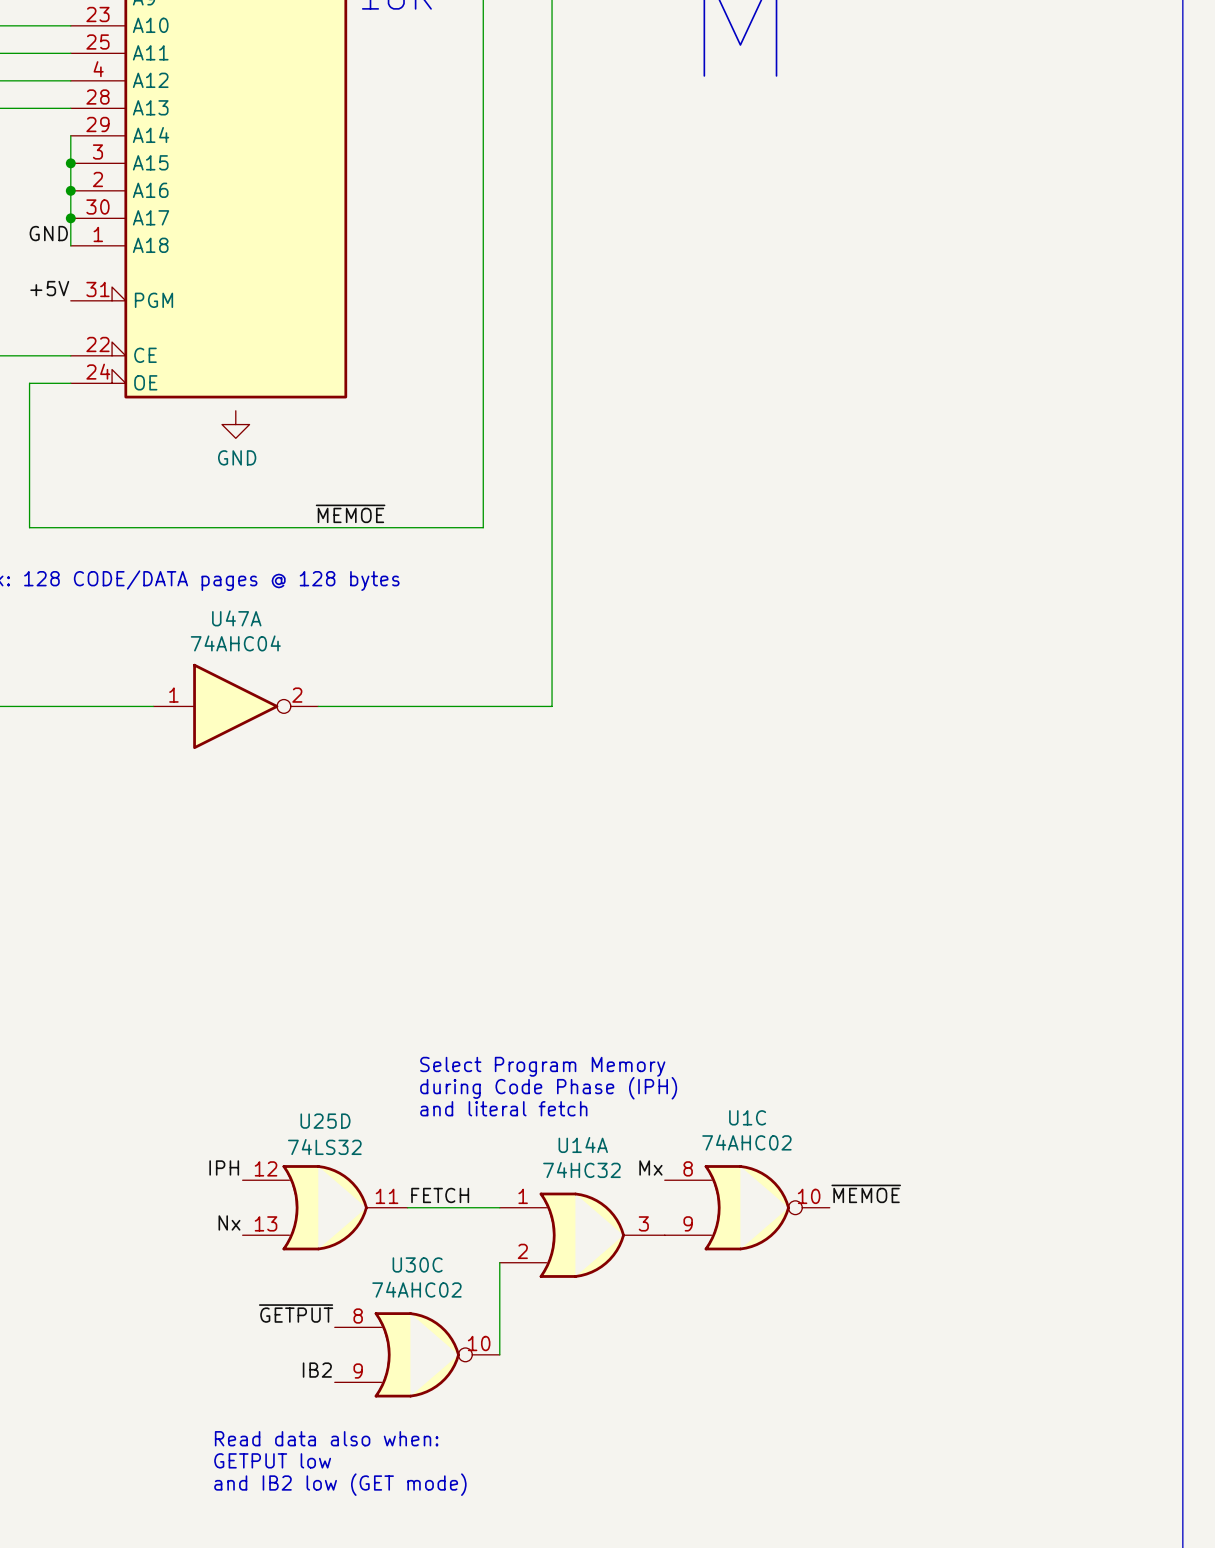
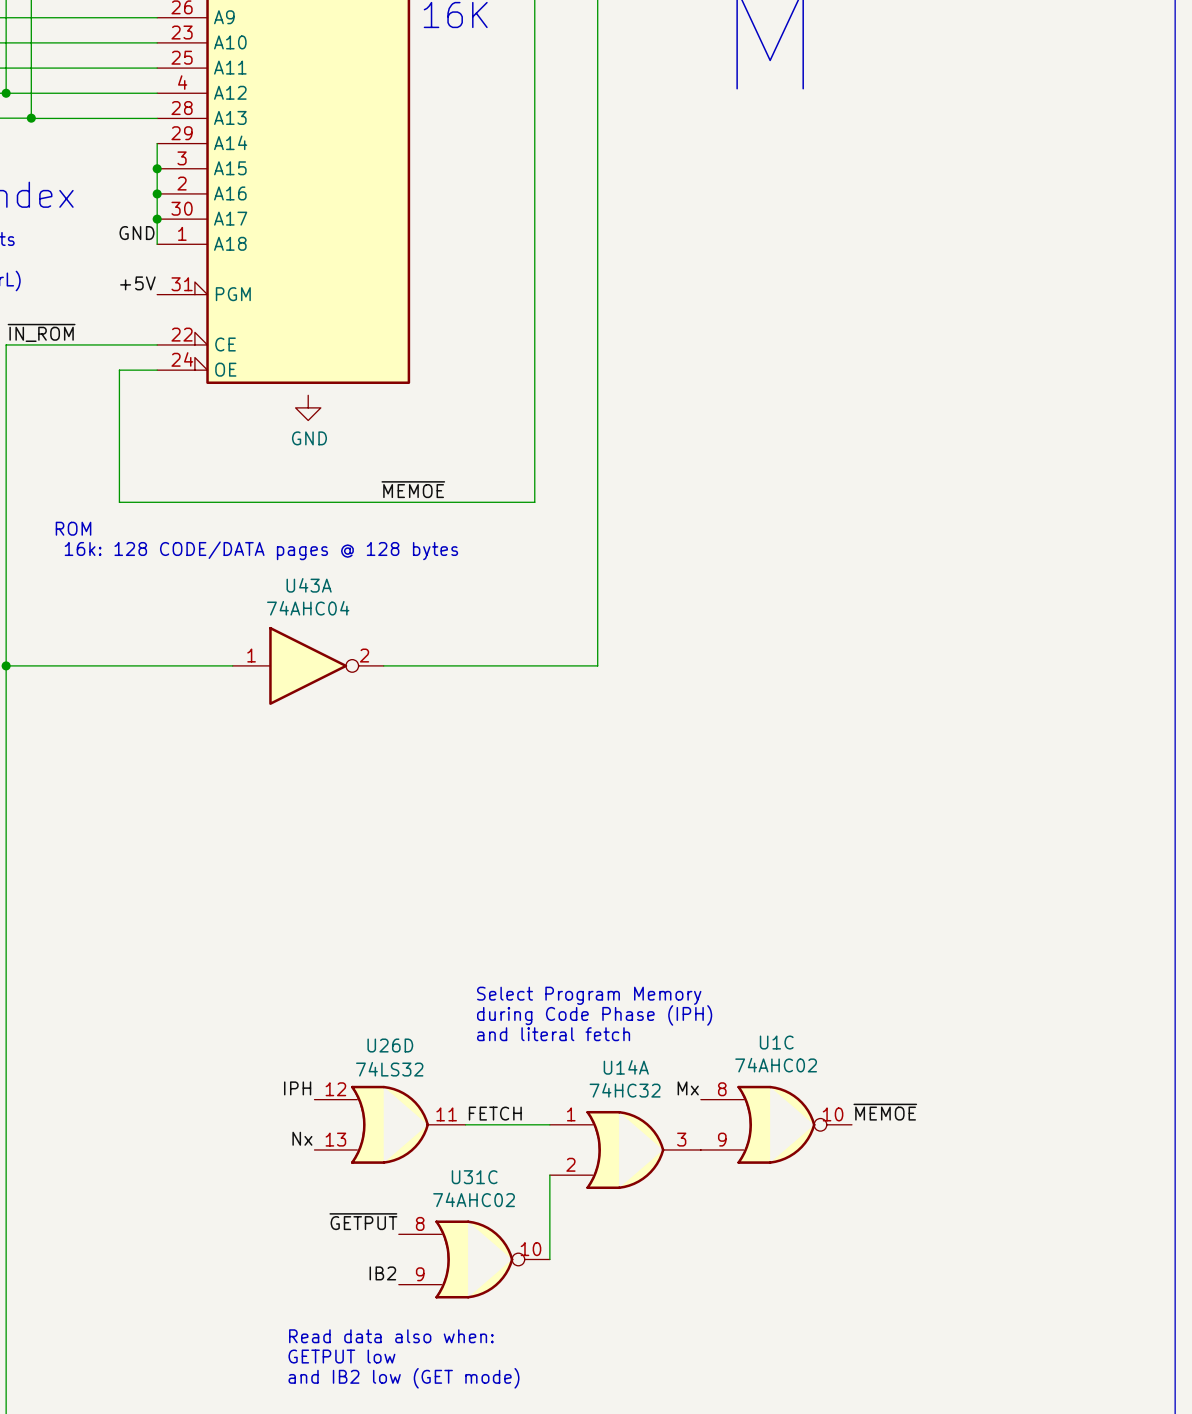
U47A name: U47A (236, 618) -> U43A (309, 585)
U25D name: U25D (325, 1121) -> U26D (390, 1045)
U30C name: U30C (417, 1264) -> U31C (474, 1177)

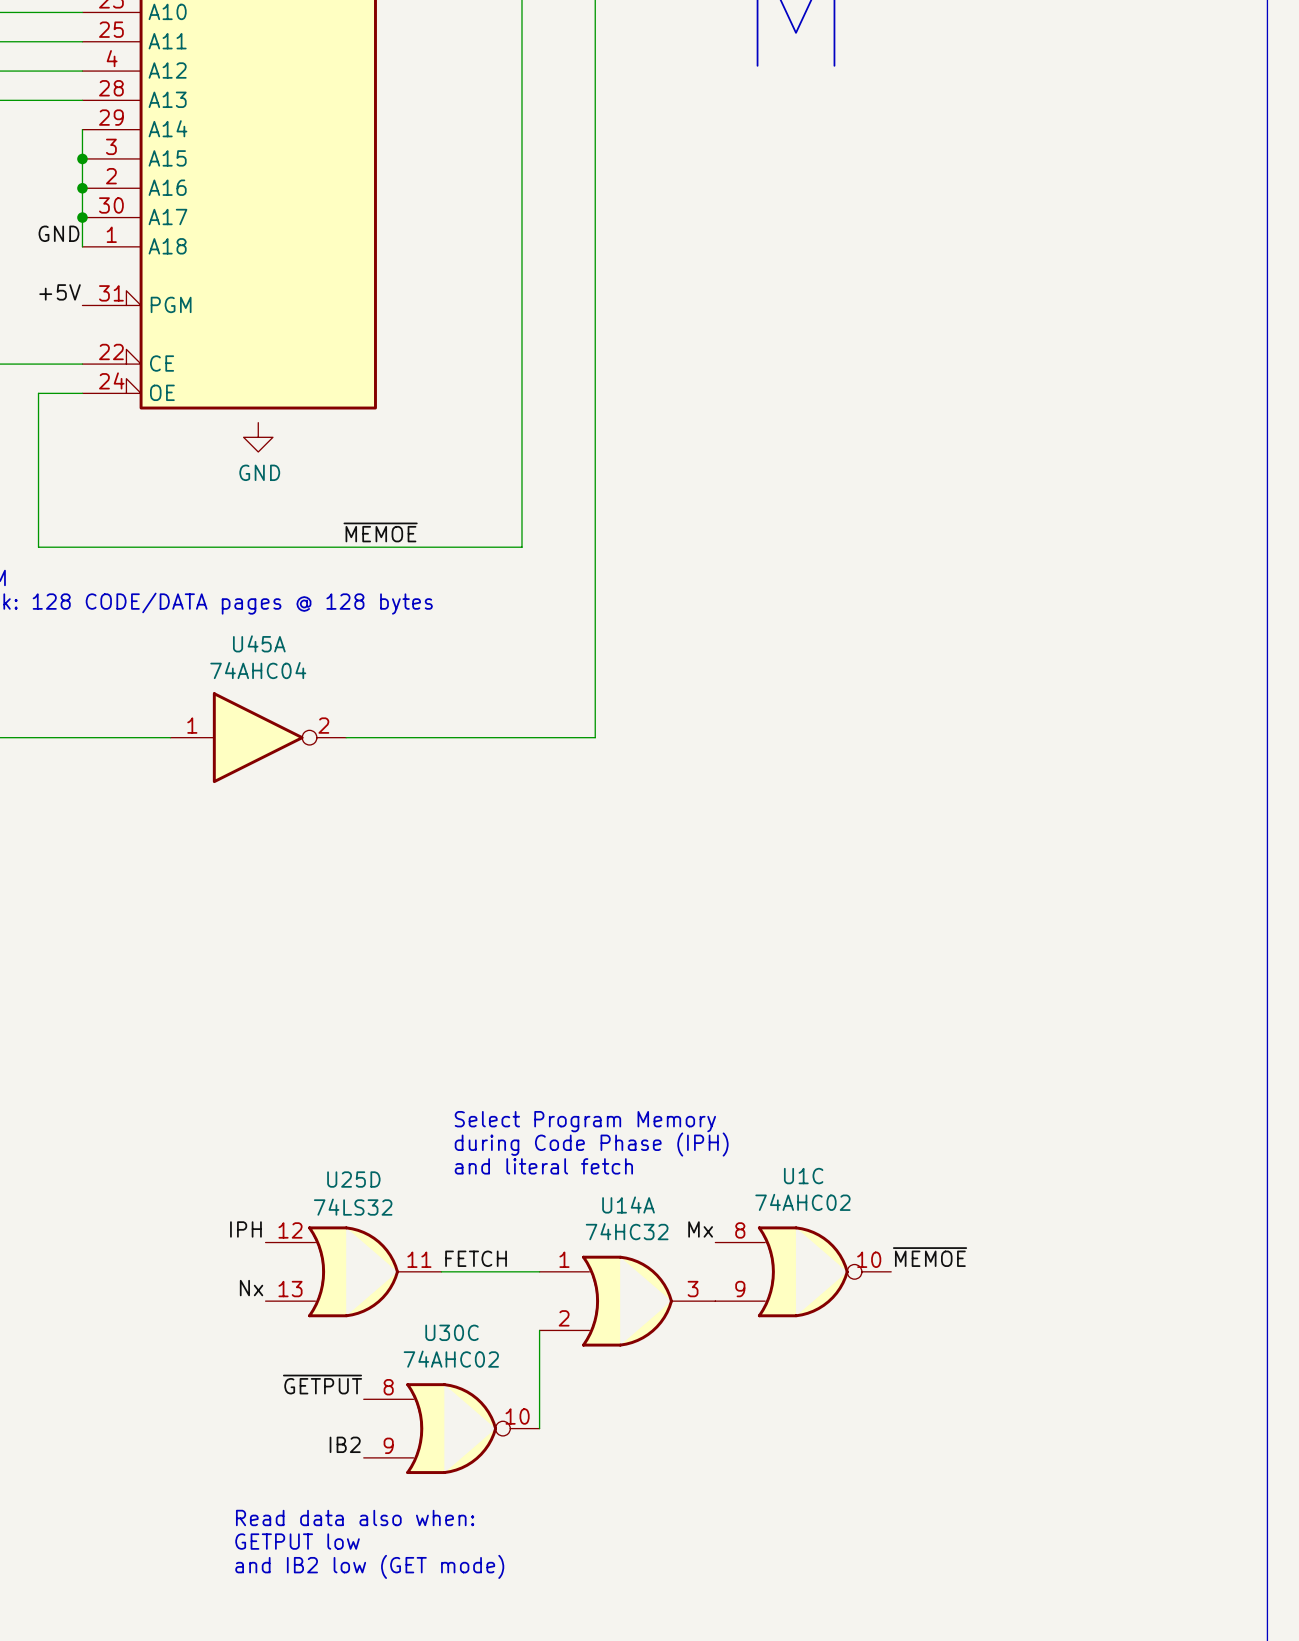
U43A name: U43A (309, 585) -> U45A (259, 643)
U26D name: U26D (390, 1045) -> U25D (353, 1179)
U31C name: U31C (474, 1177) -> U30C (452, 1332)

